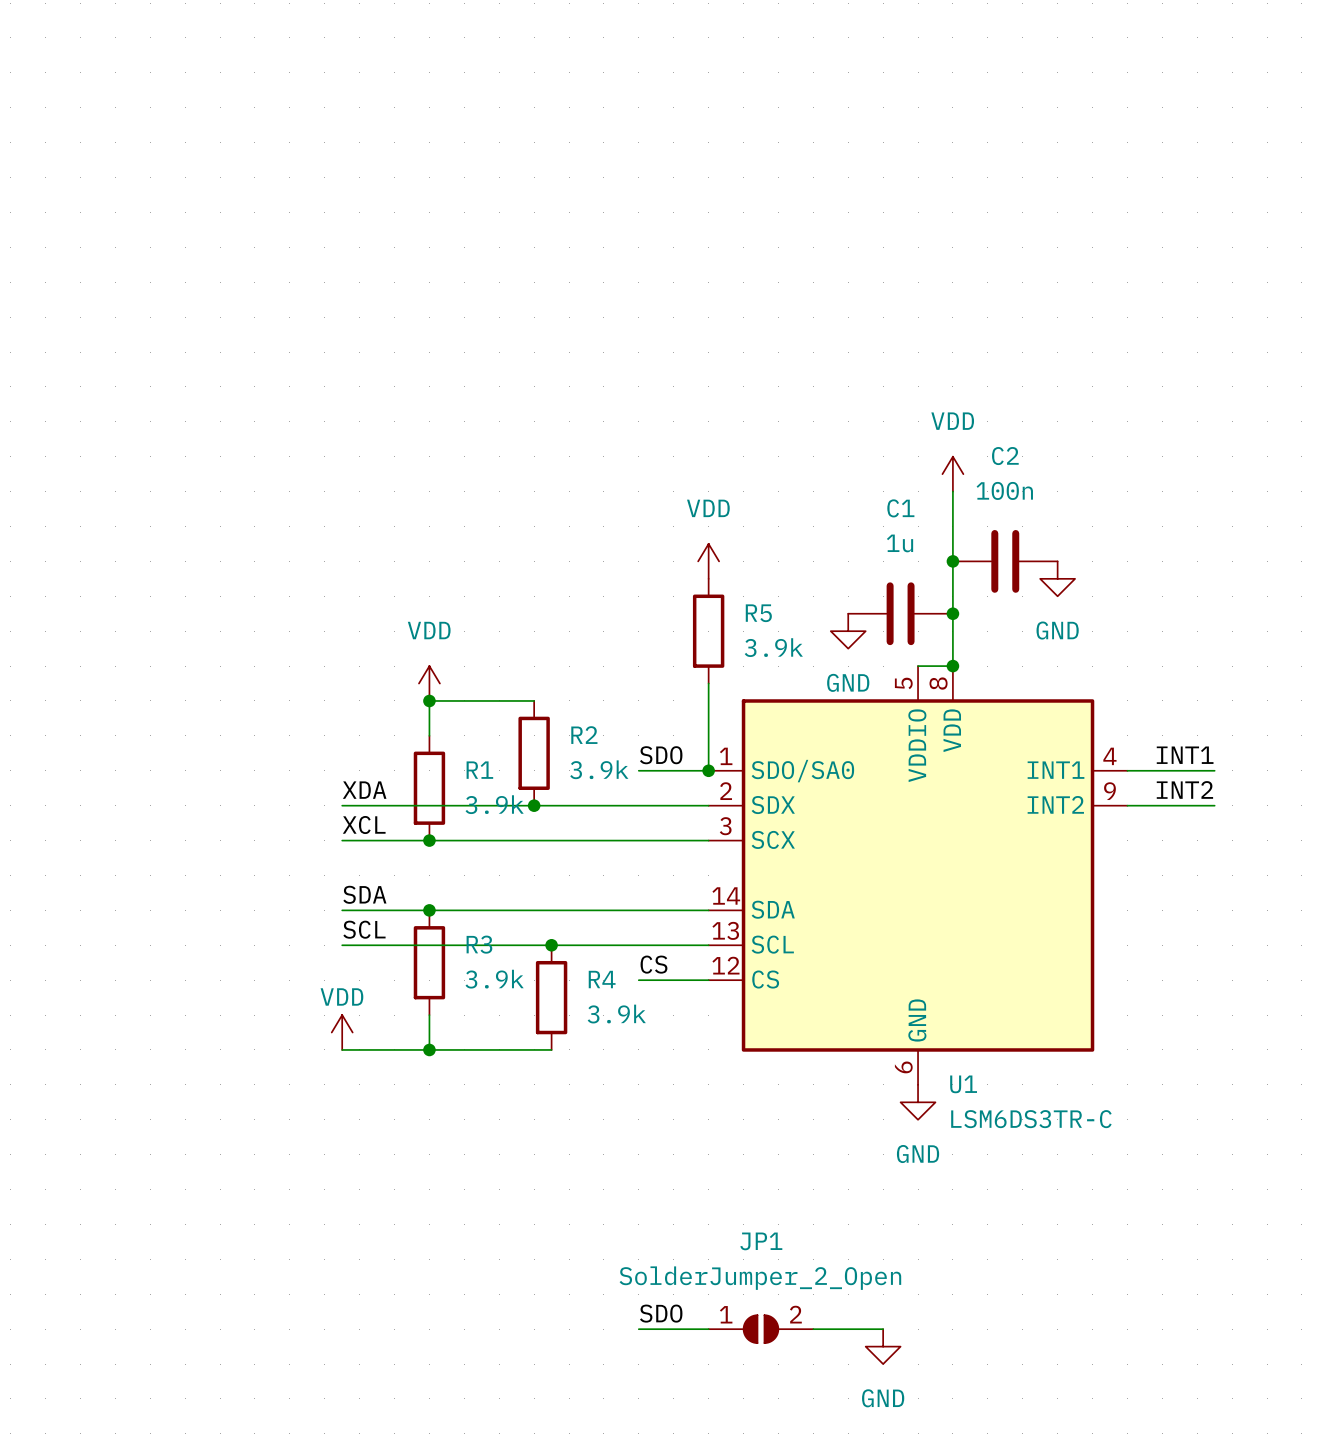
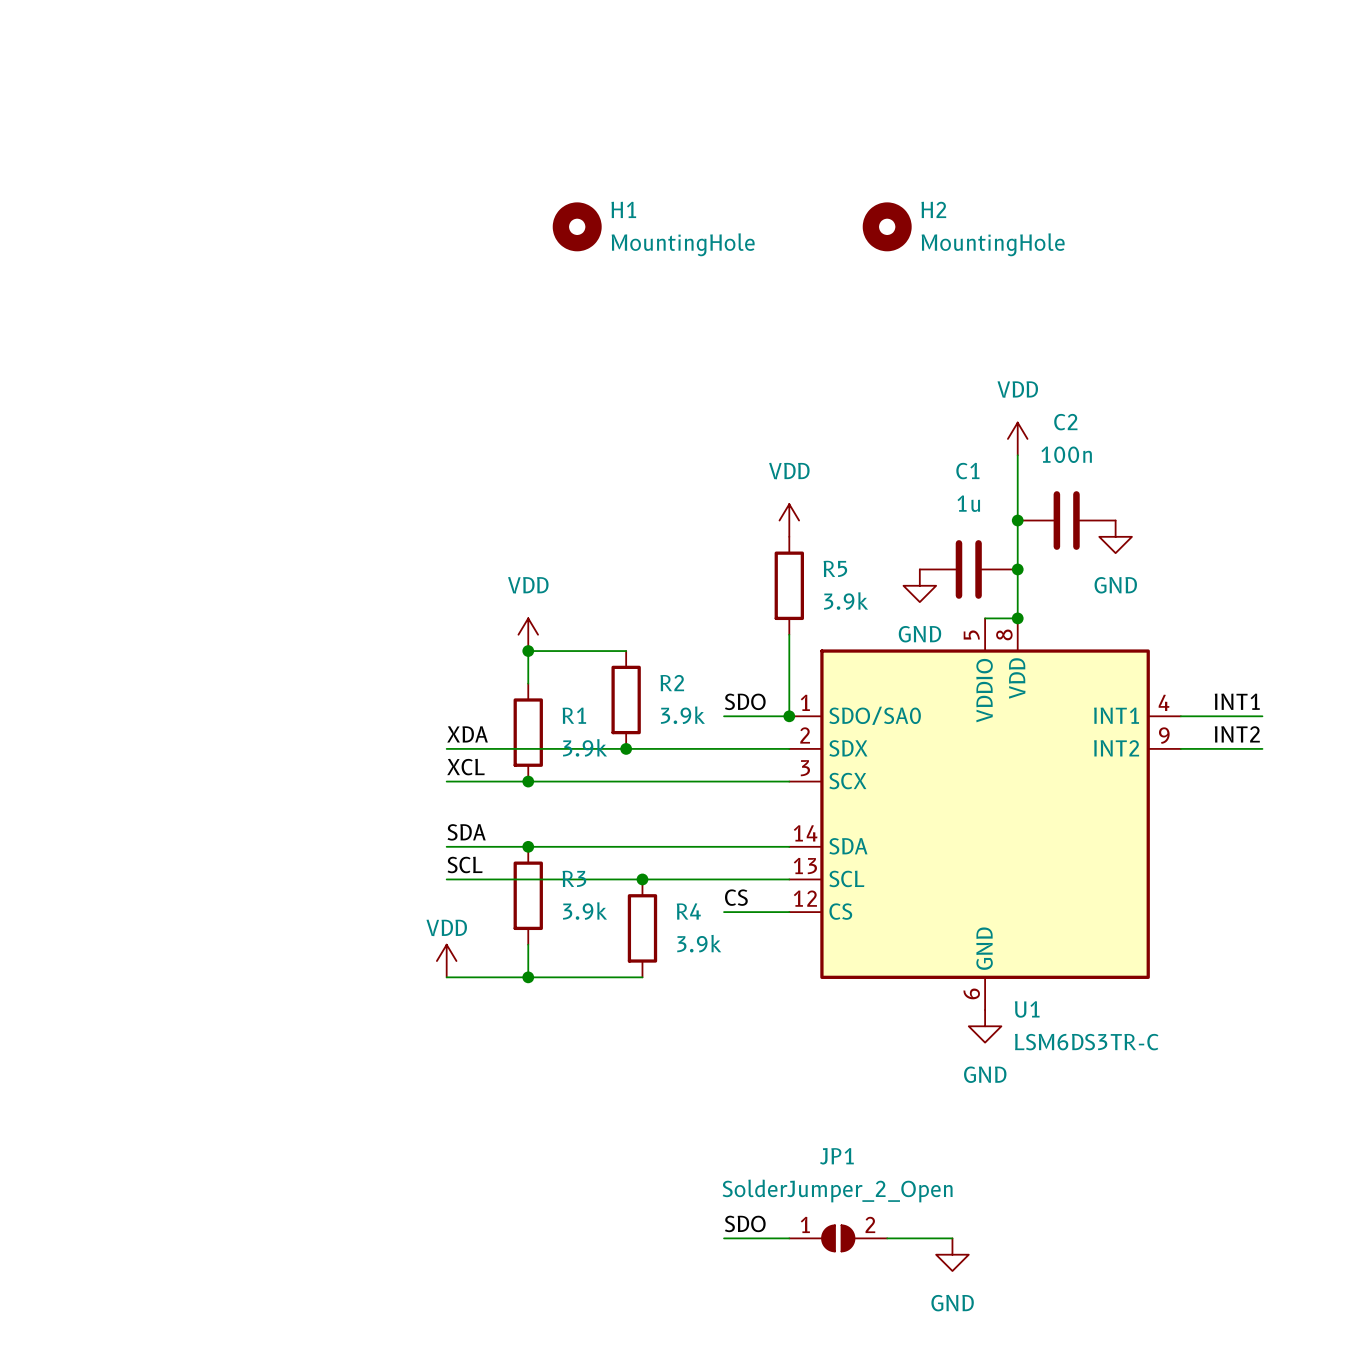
H1: none -> MountingHole (577, 226)
H2: none -> MountingHole (887, 226)

